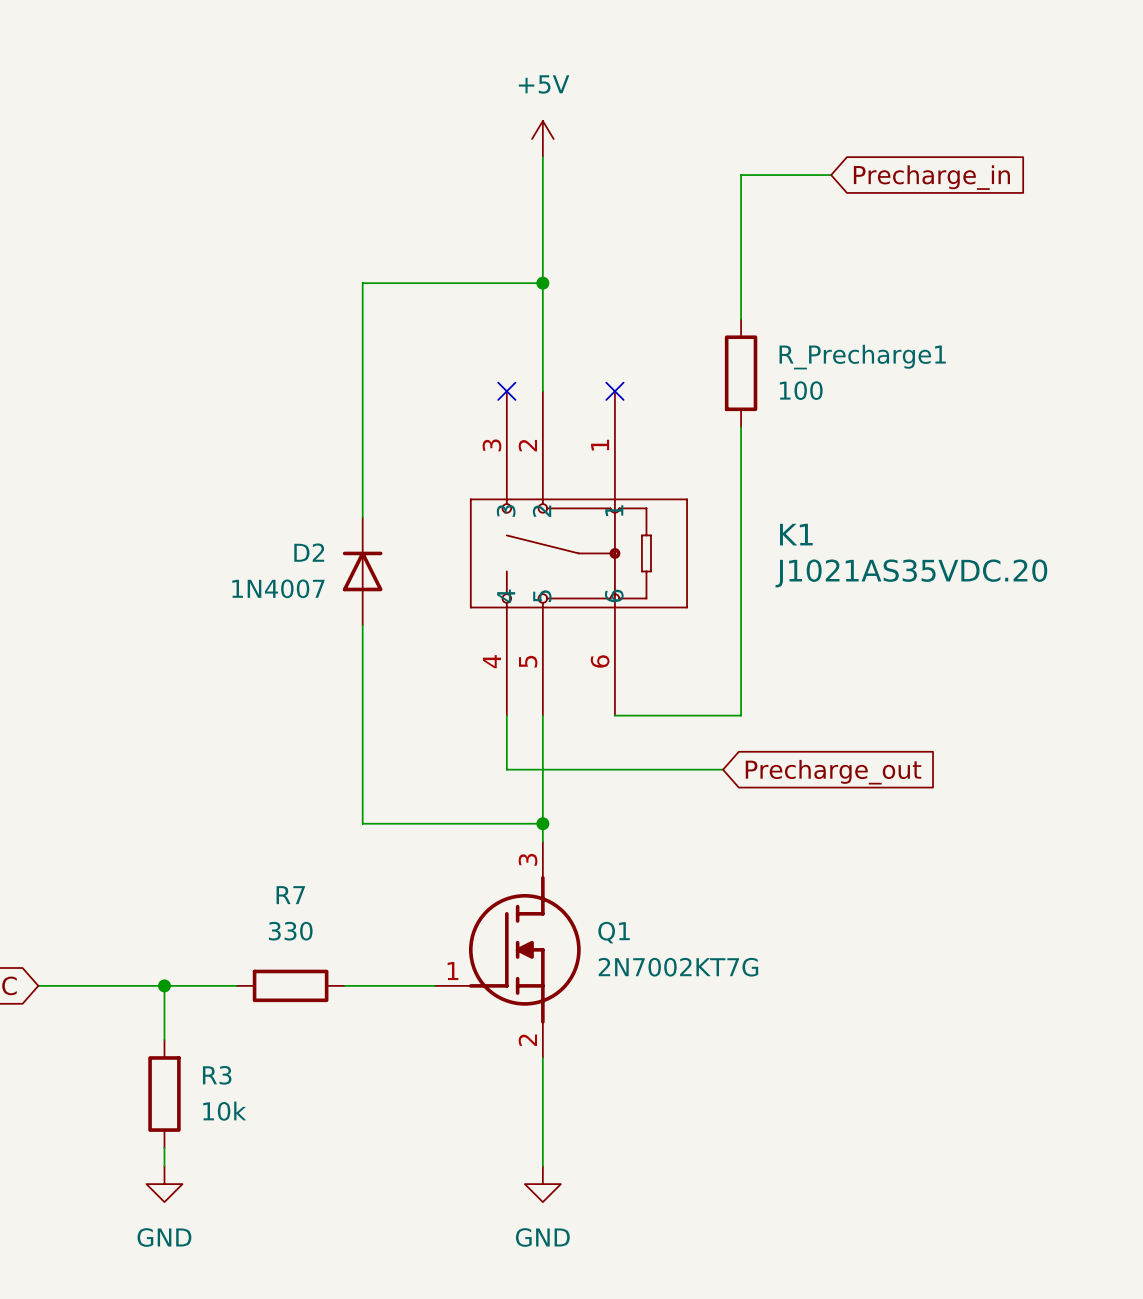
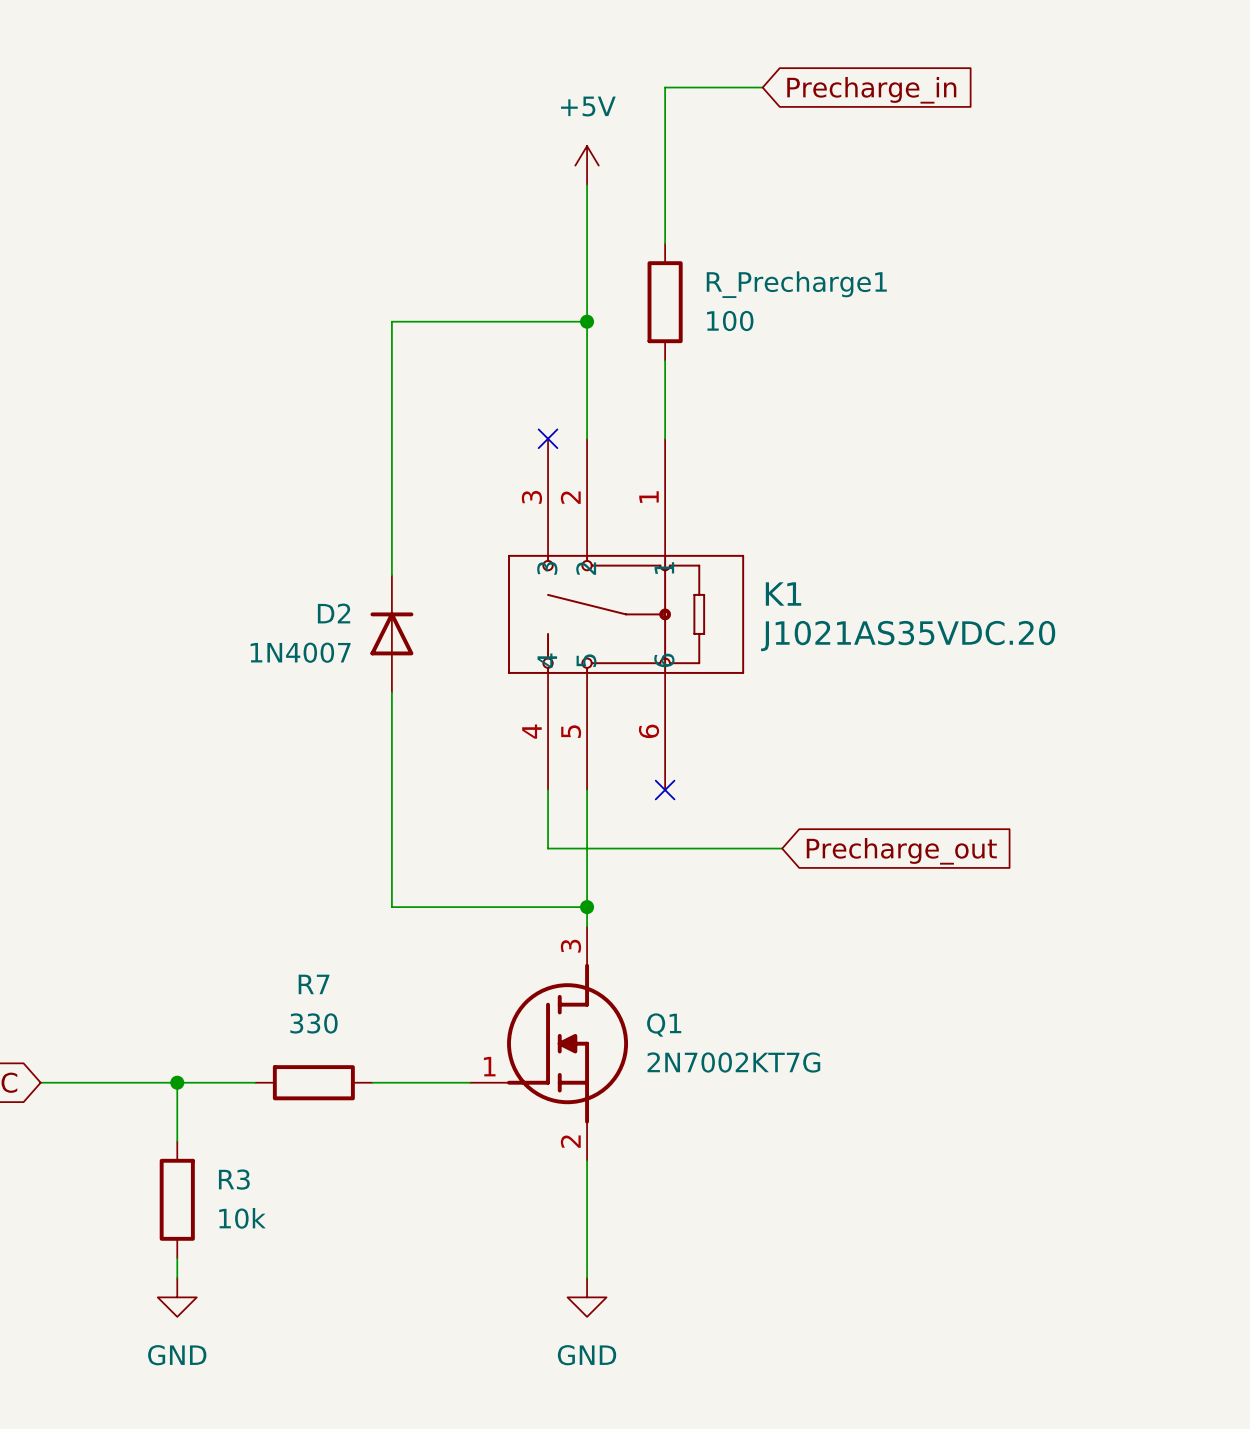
wire: (831, 175) (741, 175) (741, 319) -> (762, 87) (665, 87) (665, 243)
global label position: Precharge_in (931, 177) -> Precharge_in (871, 90)
wire: none -> (665, 360) (665, 438)
R_Precharge1 position: (741, 373) -> (665, 302)
no-connect mark: (614, 391) -> none
wire: (741, 427) (741, 715) (614, 715) -> none
K1 name position: K1 (796, 534) -> K1 (783, 594)
K1 value position: J1021AS35VDC.20 (911, 573) -> J1021AS35VDC.20 (908, 636)
no-connect mark: none -> (665, 790)

